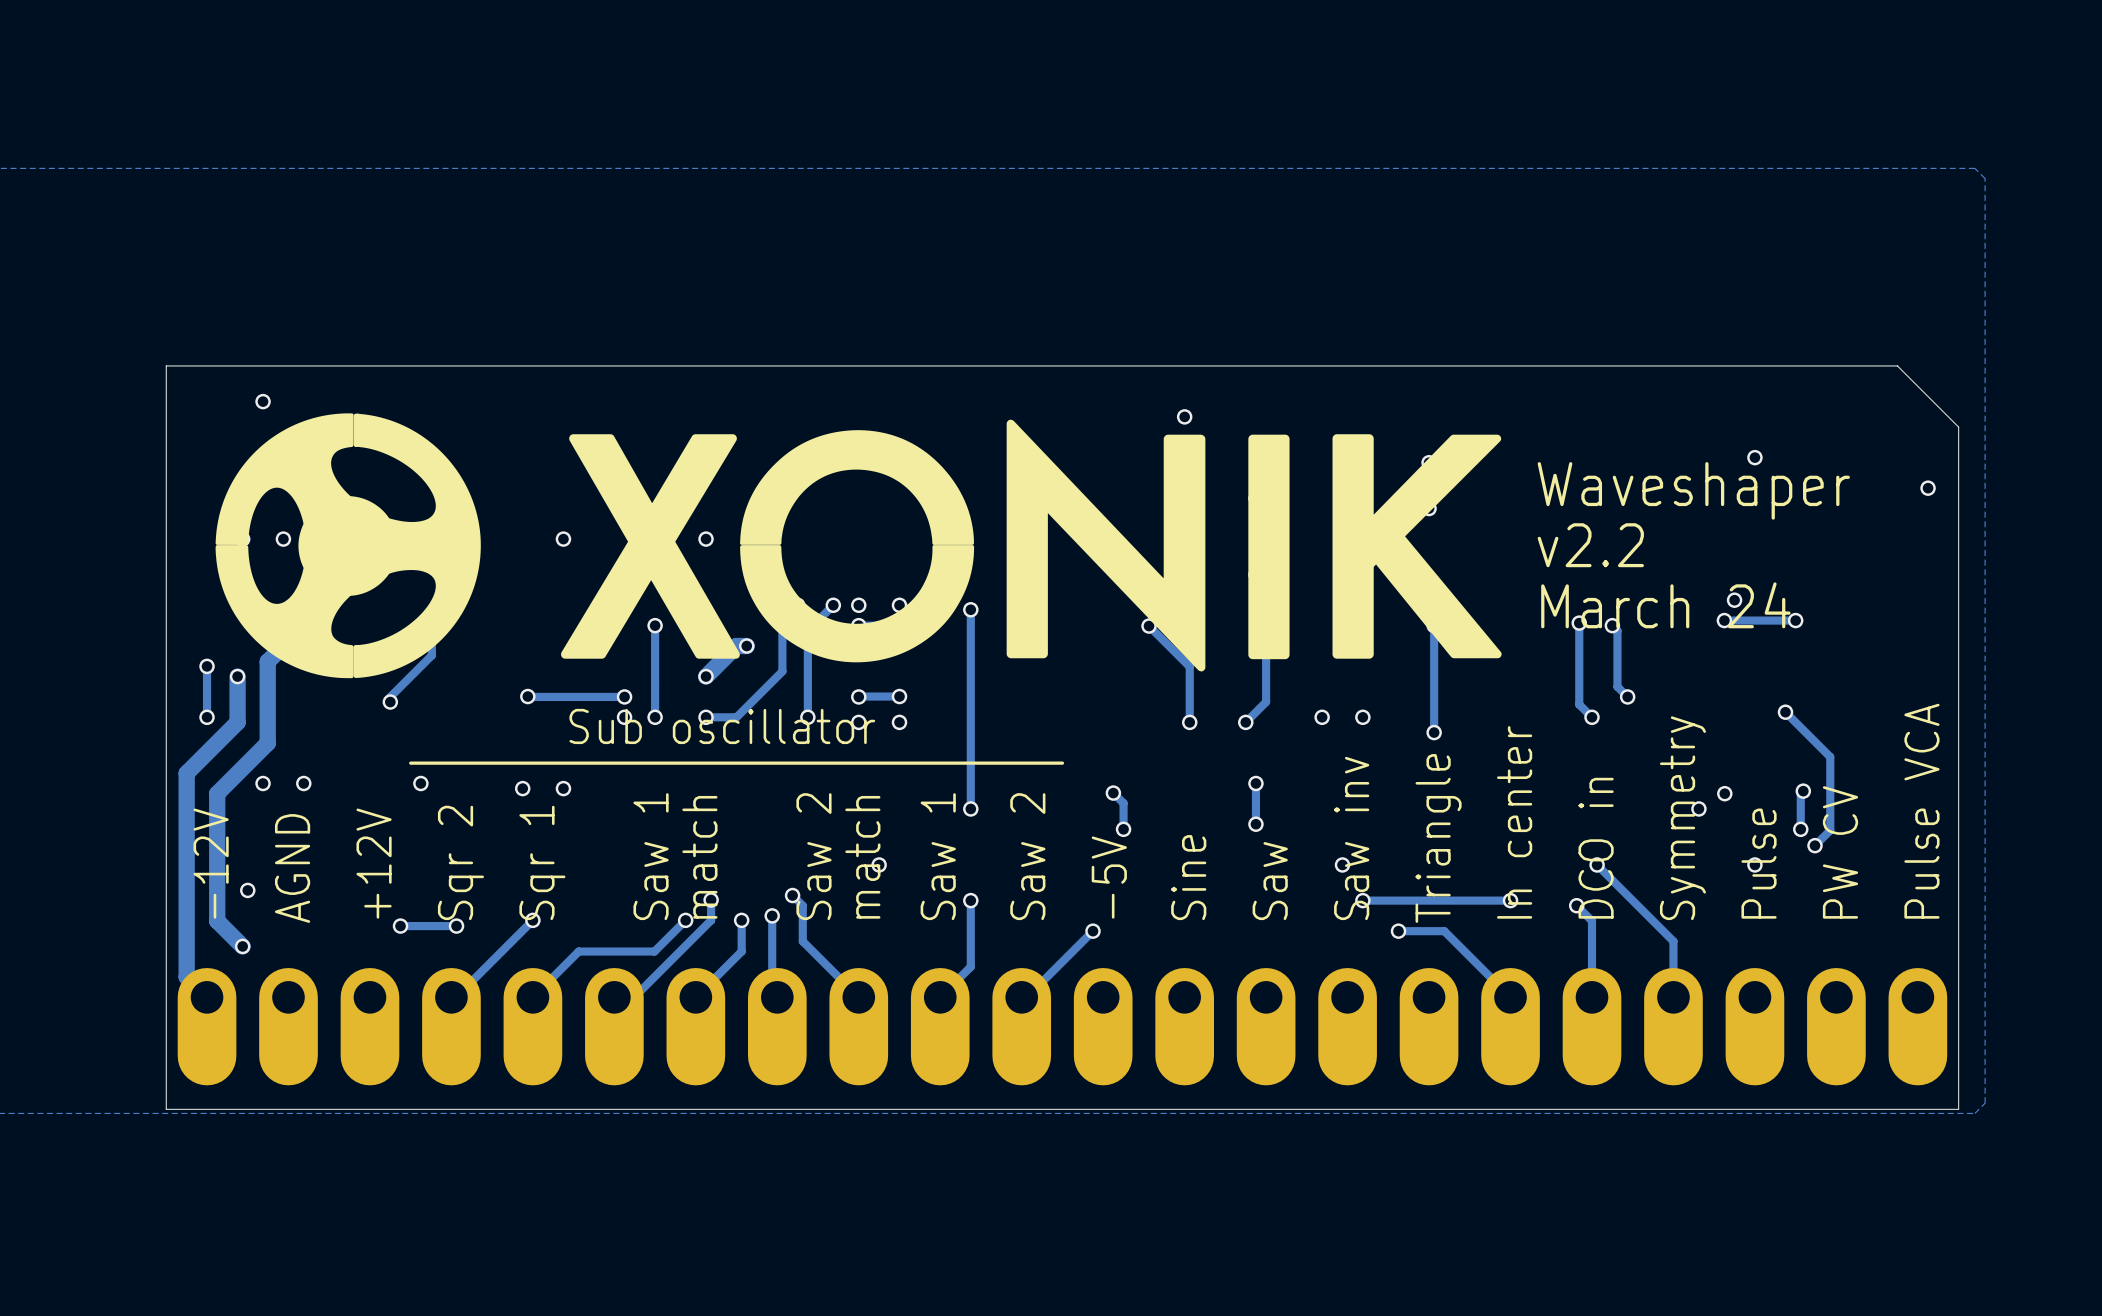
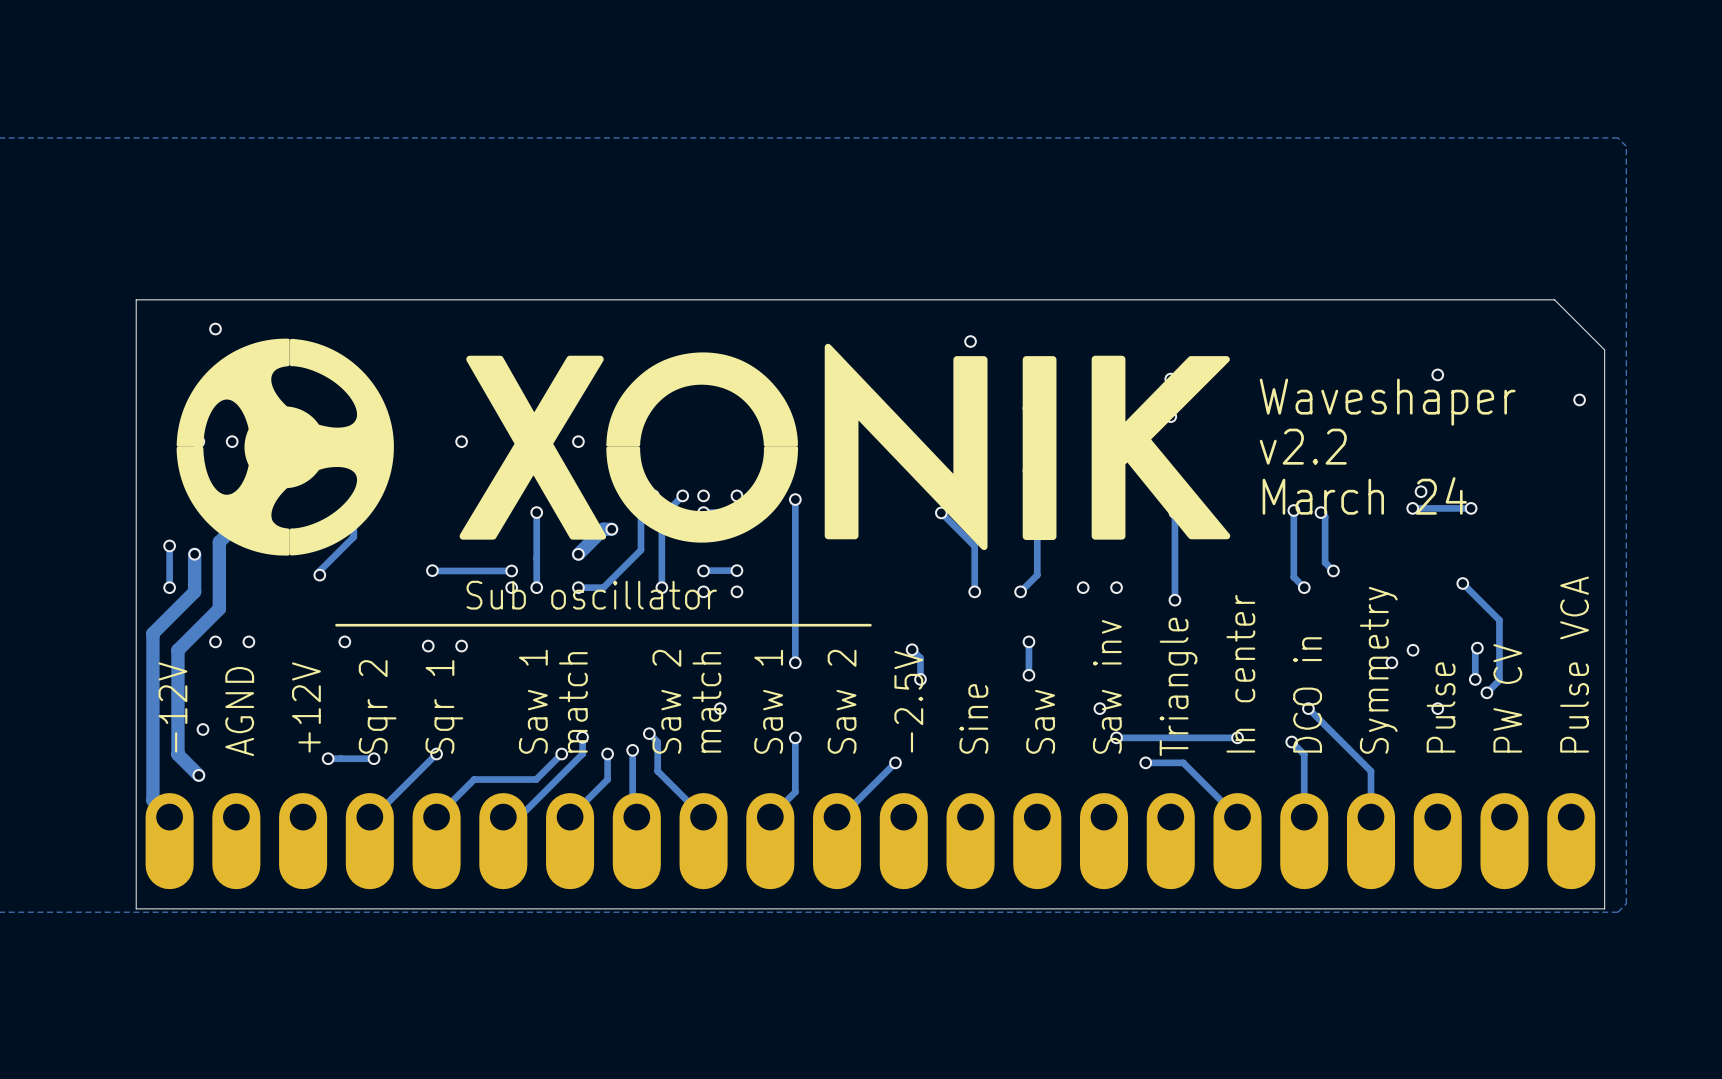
text: -5V (1109, 877) -> -2.5V (908, 701)

